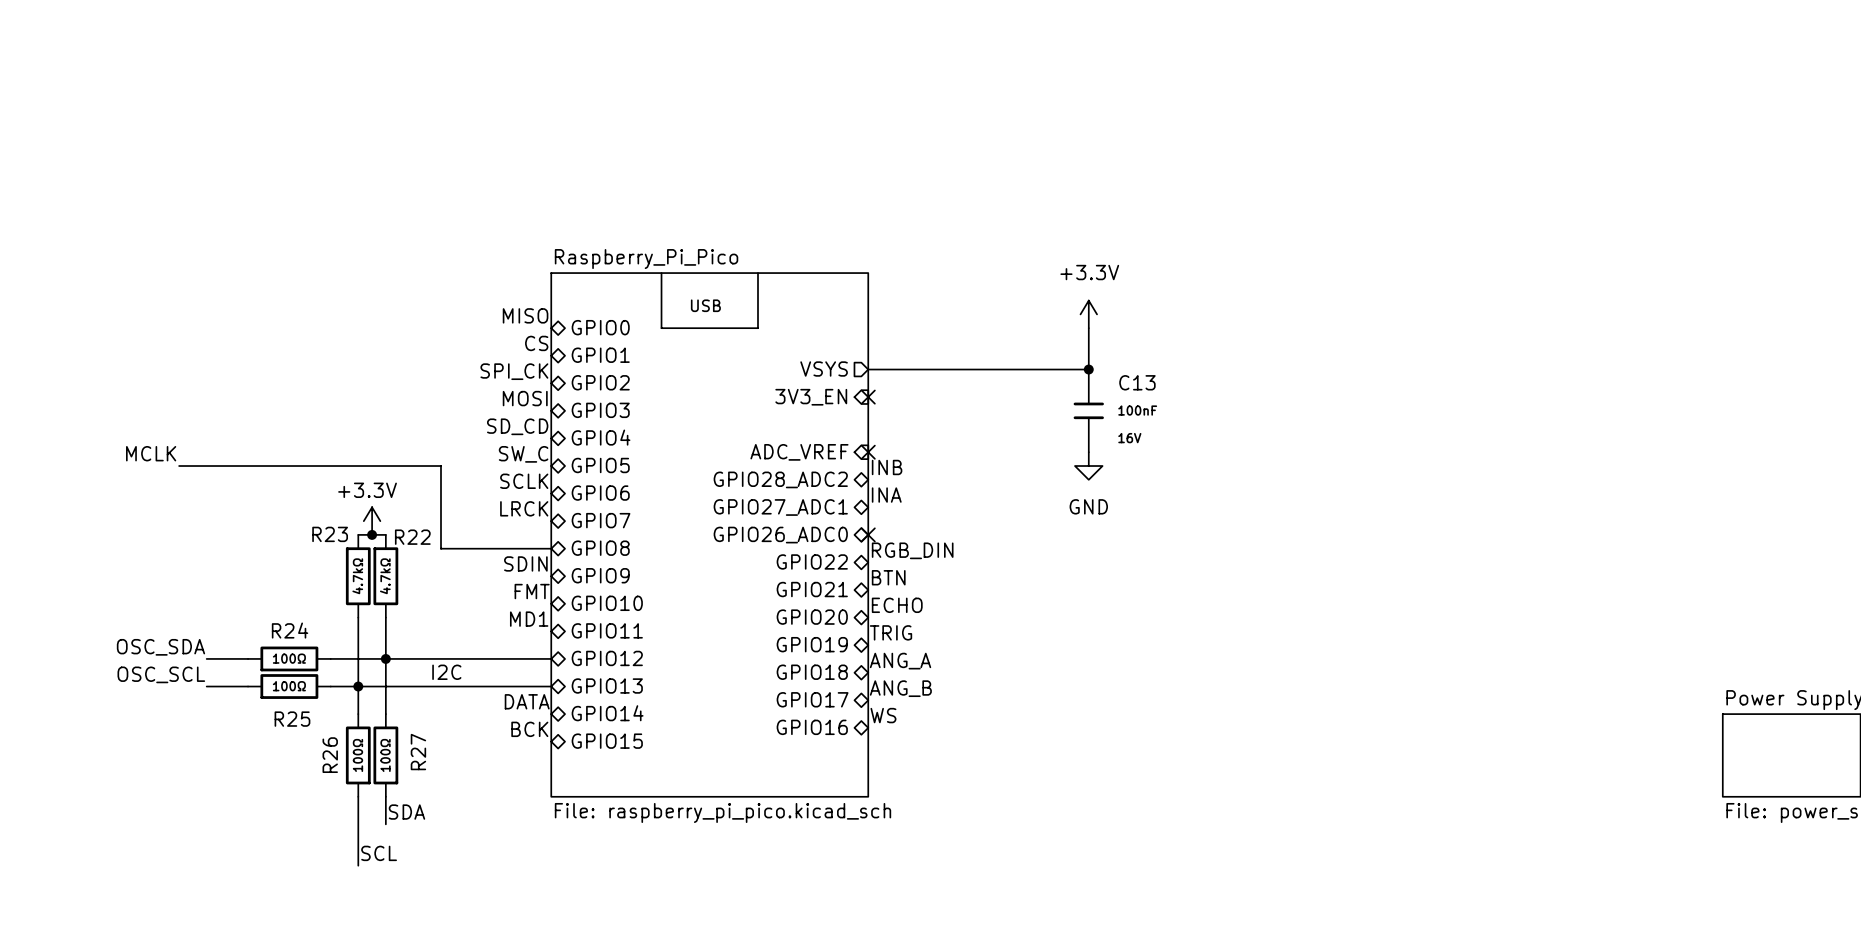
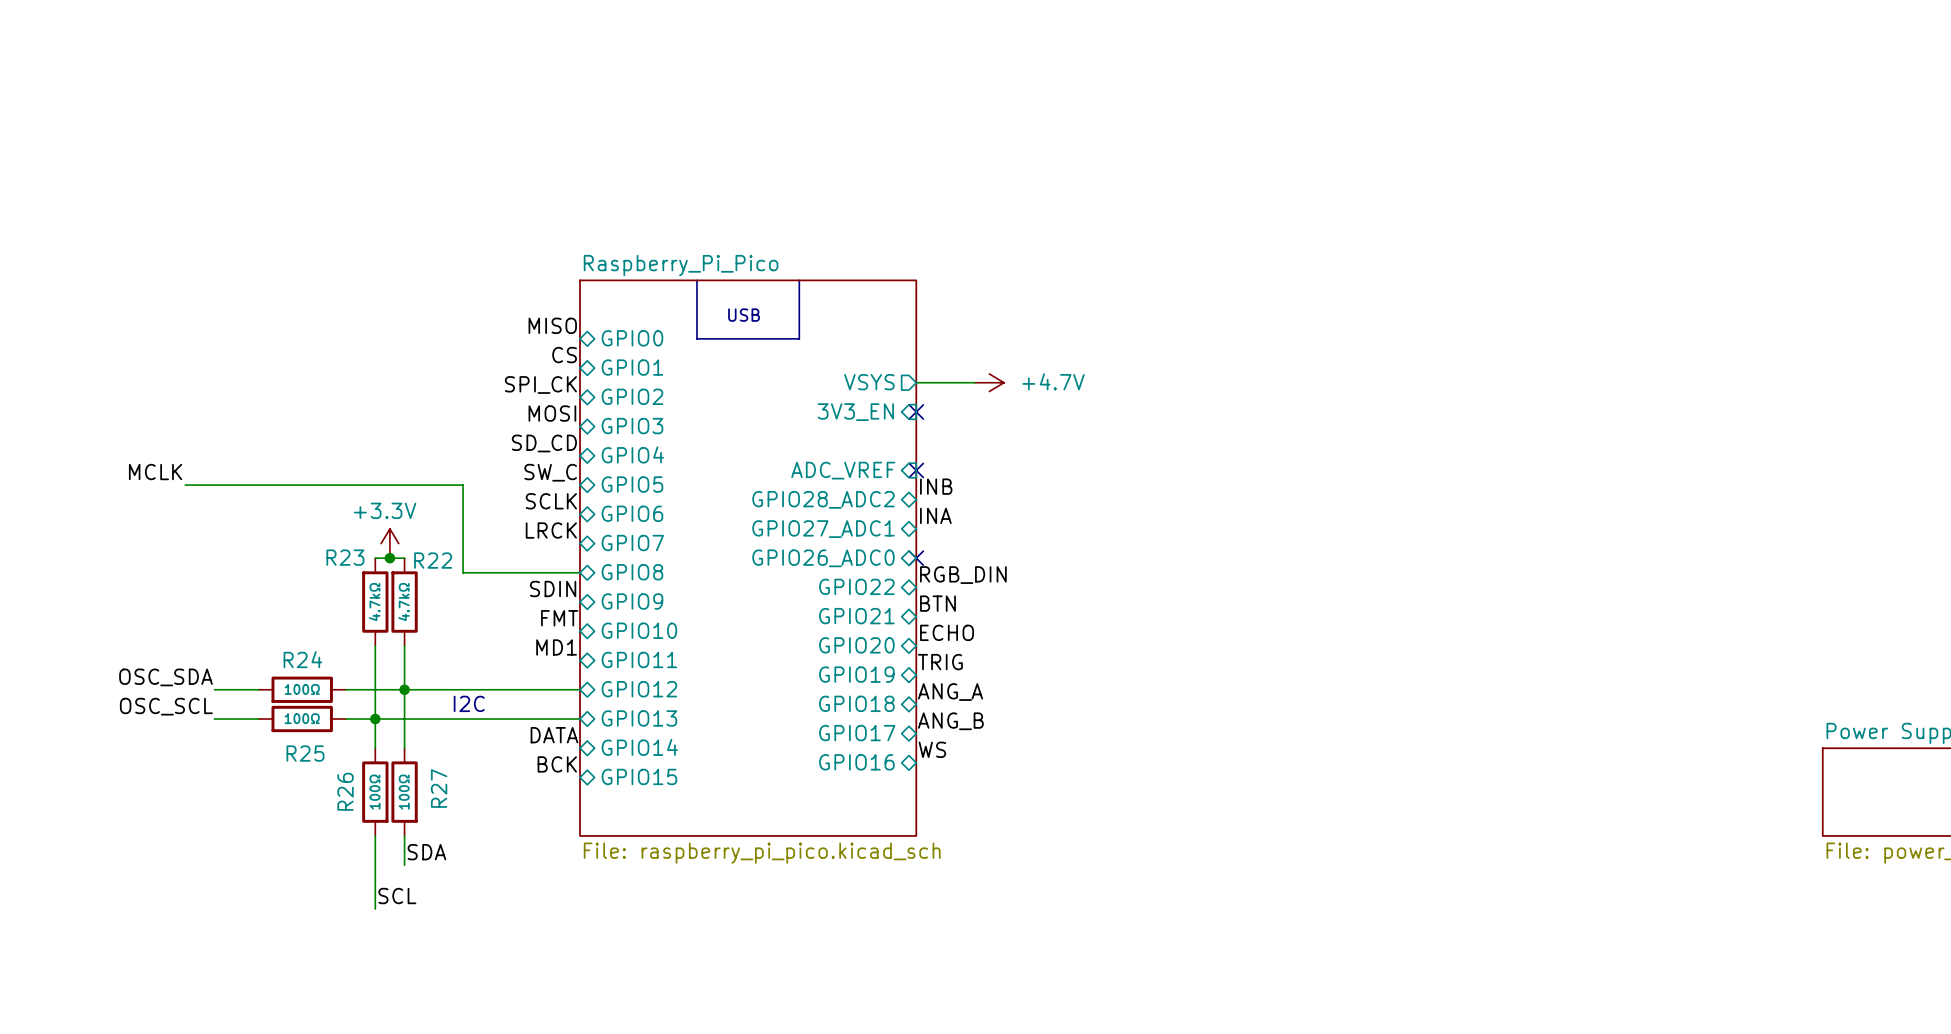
power symbol: +3.3V (1088, 314) -> none
wire: (1088, 328) (1088, 369) (923, 369) -> none
power symbol: none -> +4.7V (989, 382)
junction: (1088, 369) -> none
C13: 100nF (1088, 410) -> none
power symbol: GND (1088, 466) -> none

